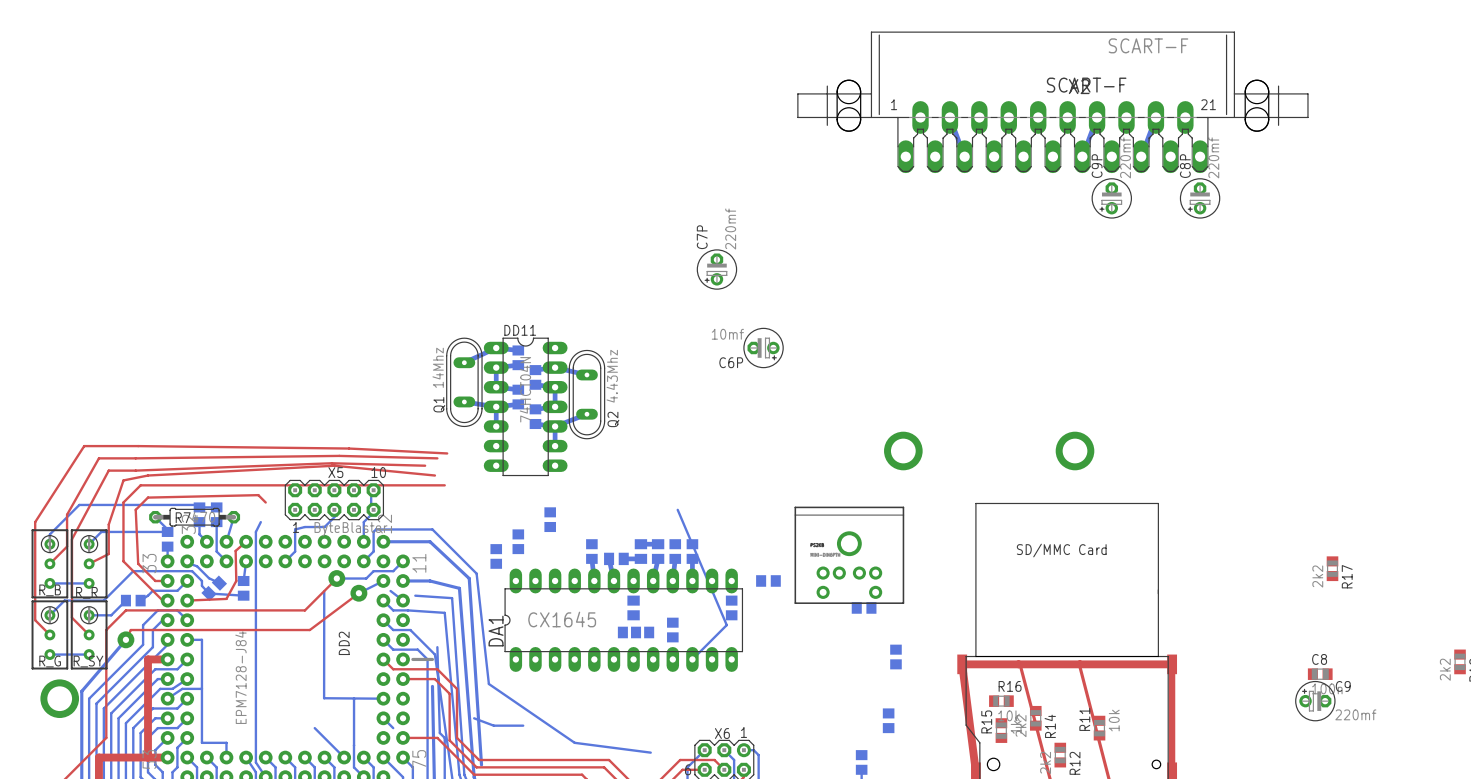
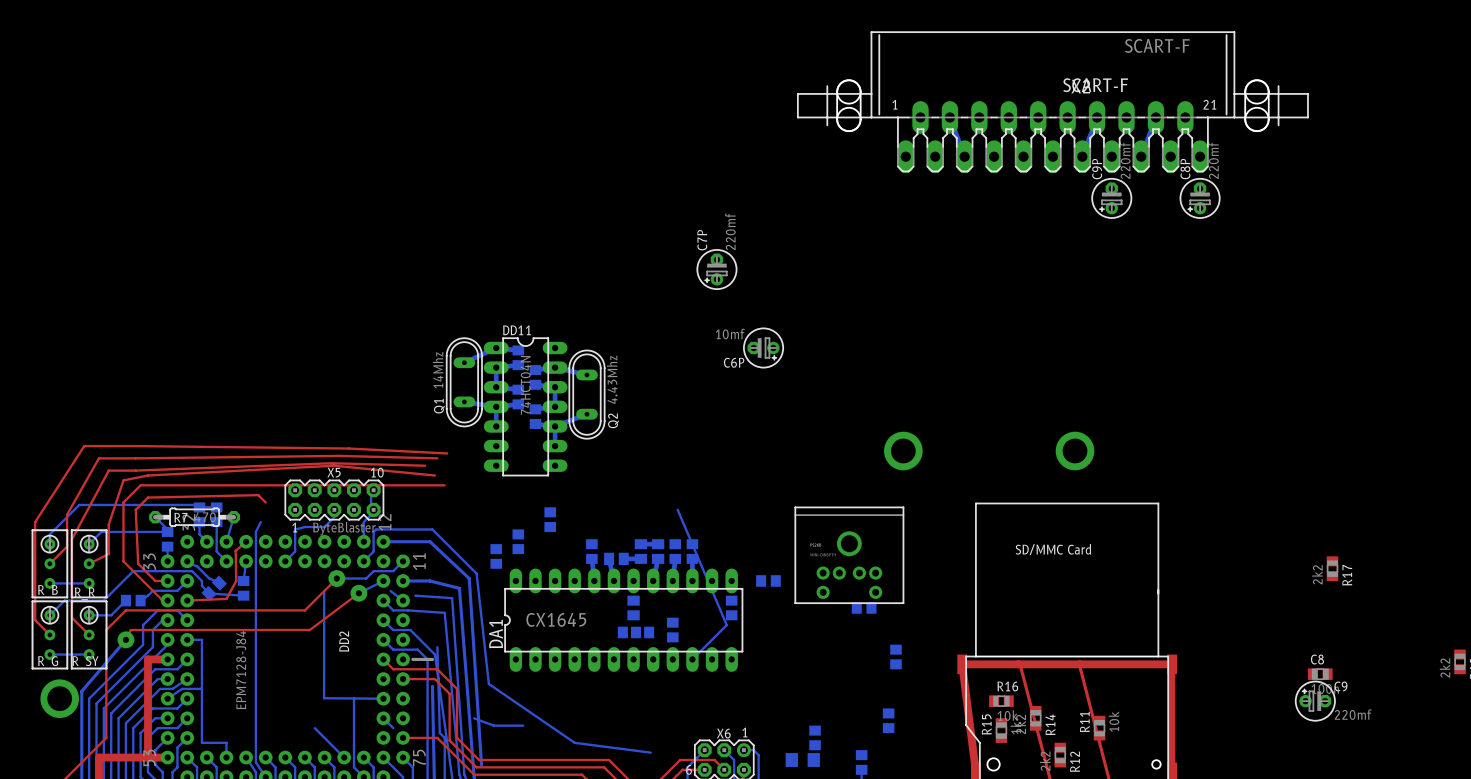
part: none -> (815, 737)
part: none -> (802, 760)

